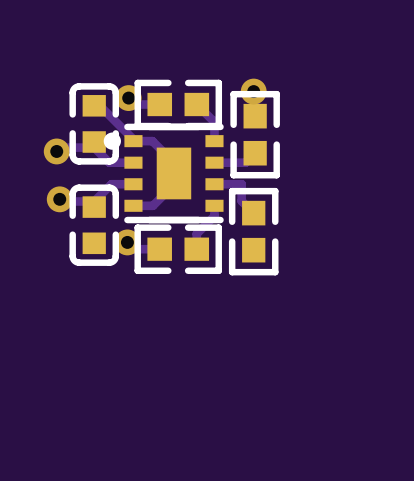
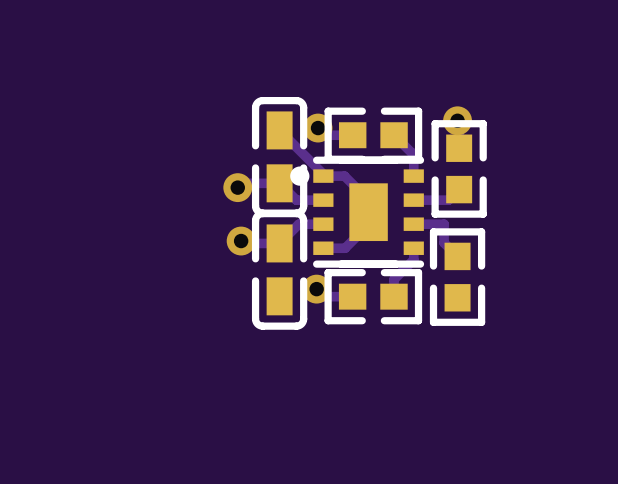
part footprint: [69, 83, 120, 165] -> [251, 96, 308, 217]
part footprint: [69, 184, 120, 266] -> [251, 210, 308, 330]

